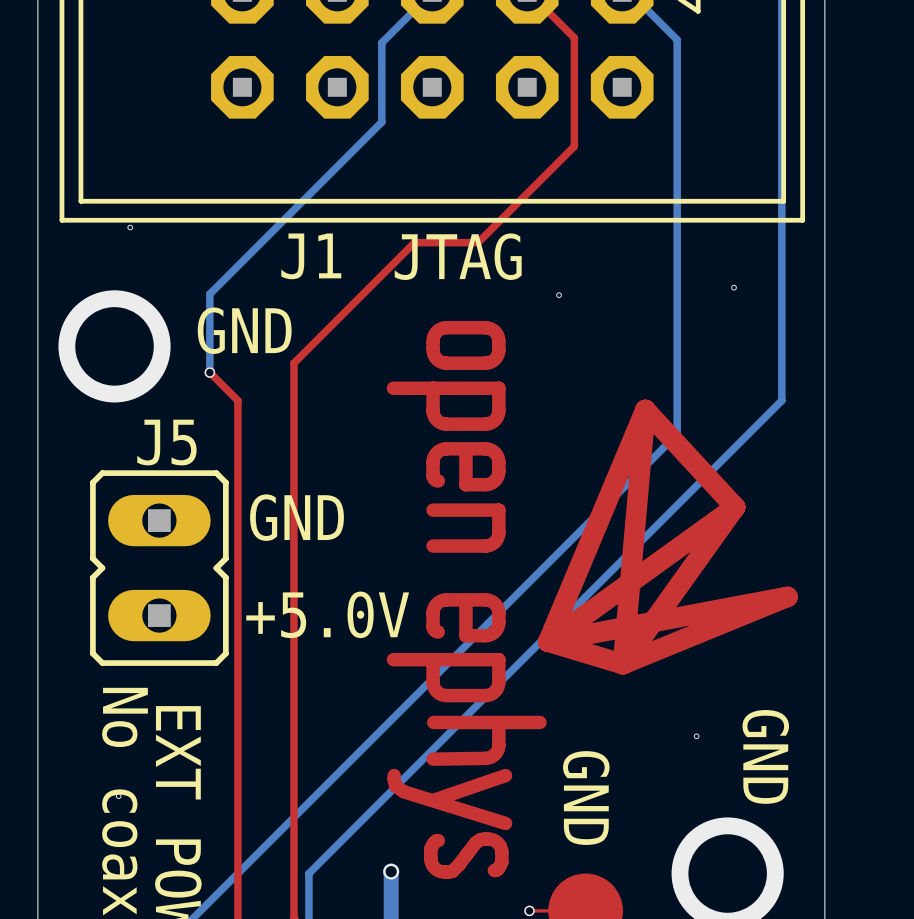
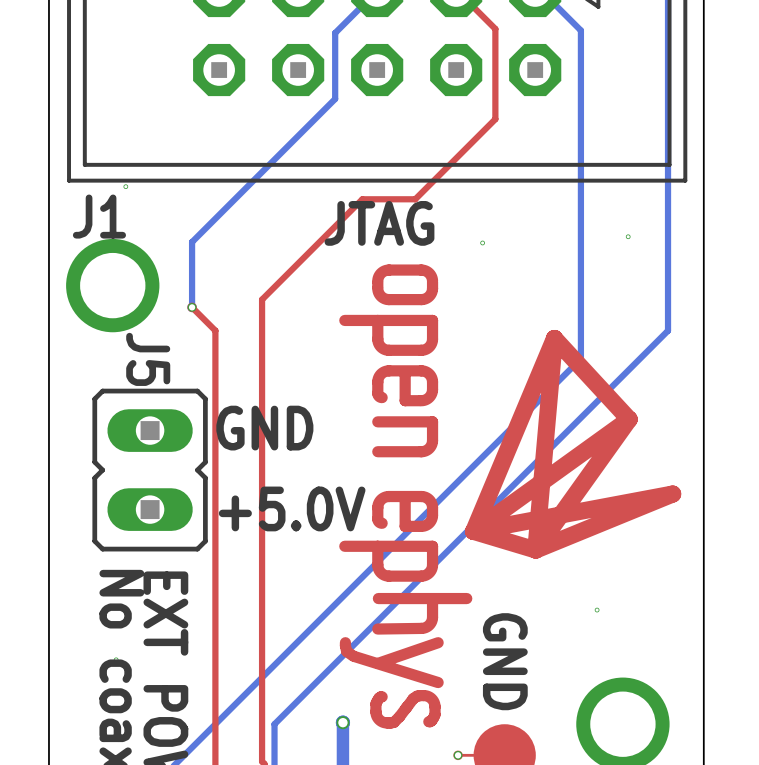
J1 name position: J1 (311, 256) -> J1 (99, 216)
text position: JTAG (458, 256) -> JTAG (379, 223)
text: GND (244, 330) -> none
J5 name rotation: 0° (166, 442) -> 90° clockwise (148, 359)
text: GND (765, 756) -> none

